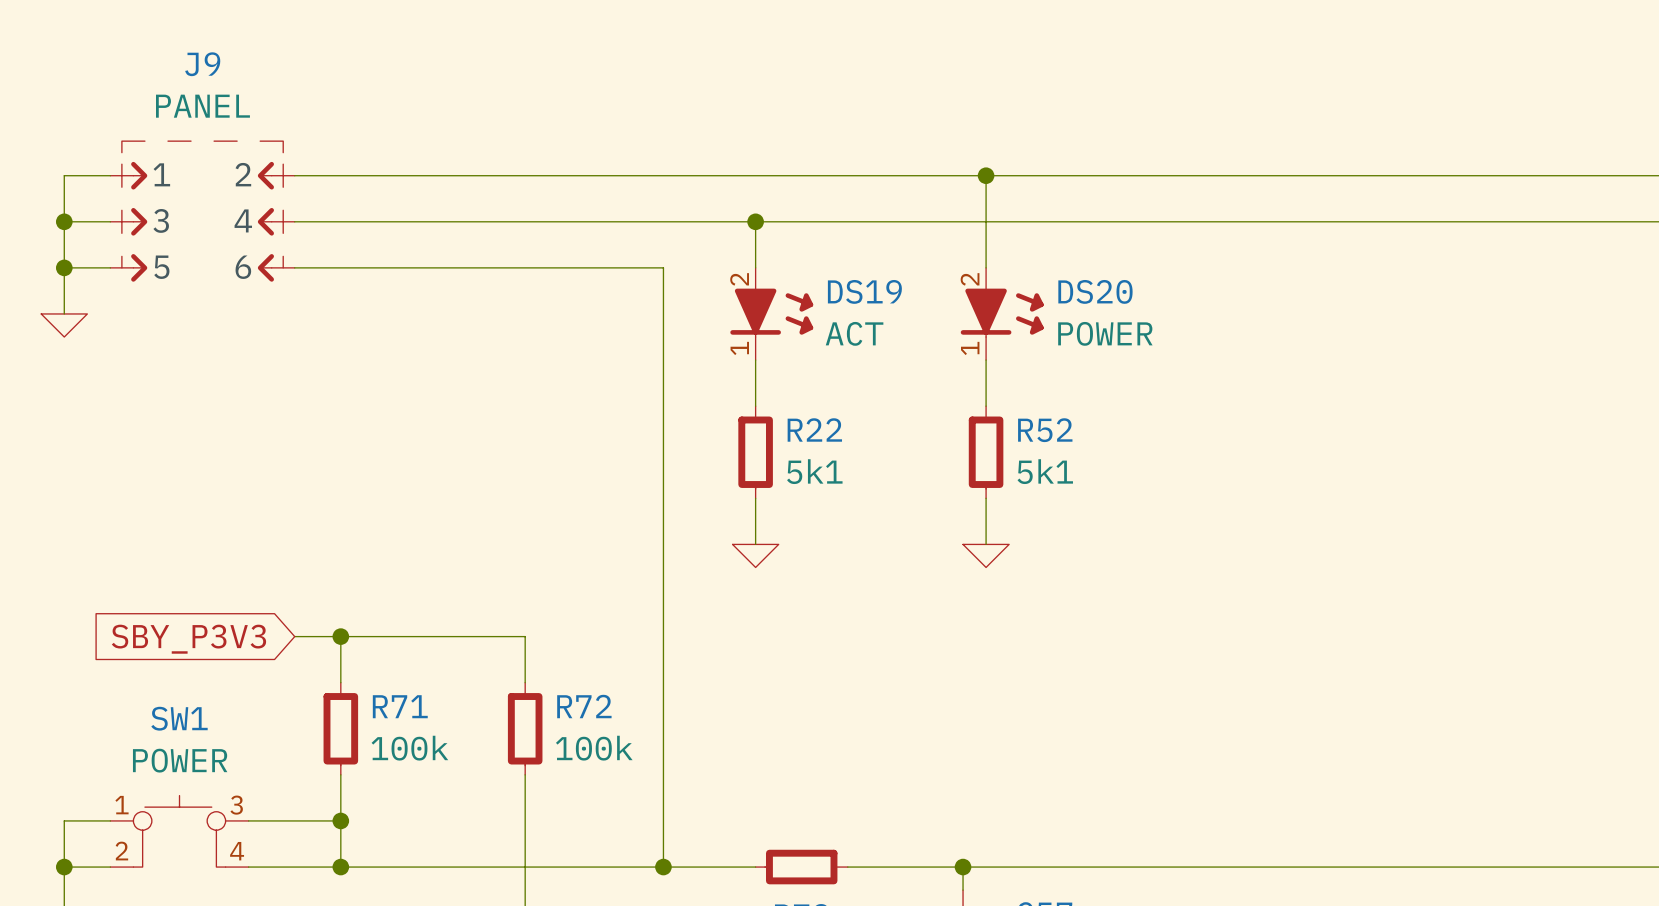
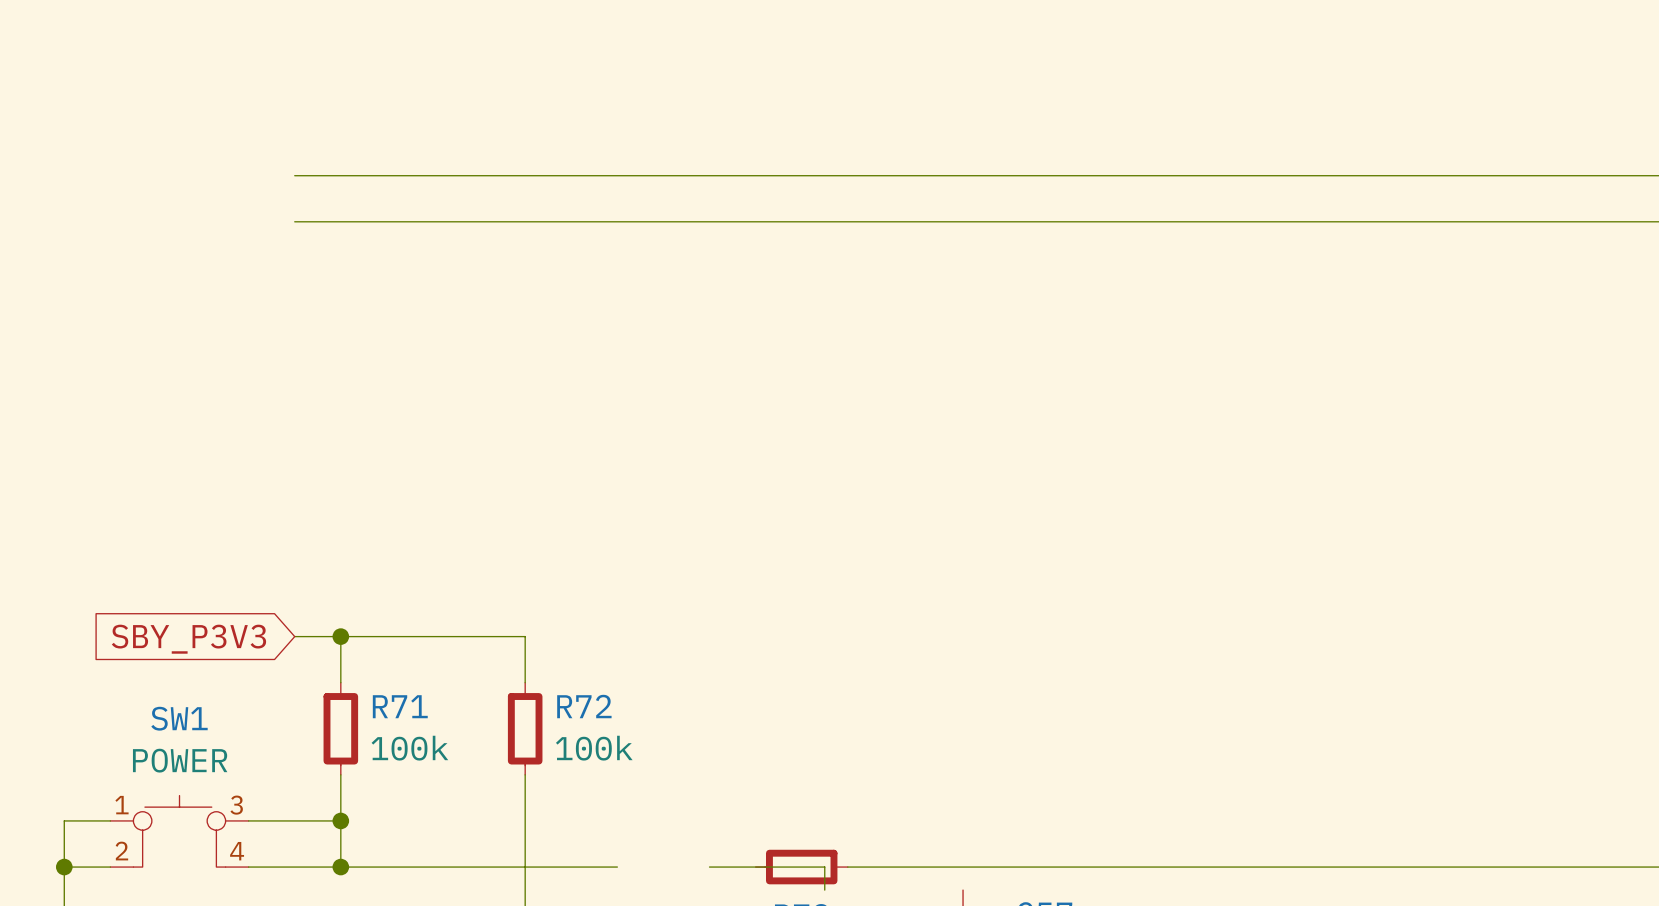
wire: (110, 175) (64, 175) (64, 313) -> none
wire: (986, 175) (986, 267) -> none
junction: (986, 175) -> none
J9: PANEL (202, 211) -> none
wire: (64, 221) (110, 221) -> none
junction: (64, 221) -> none
wire: (755, 221) (755, 267) -> none
junction: (755, 221) -> none
wire: (64, 267) (110, 267) -> none
junction: (64, 267) -> none
wire: (294, 267) (663, 267) (663, 867) -> none
DS19: ACT (771, 313) -> none
DS20: POWER (1002, 313) -> none
power symbol: (64, 325) -> none
wire: (755, 360) (755, 406) -> none
wire: (986, 360) (986, 406) -> none
R22: 5k1 (755, 452) -> none
R52: 5k1 (986, 452) -> none
wire: (755, 498) (755, 544) -> none
wire: (986, 498) (986, 544) -> none
power symbol: (755, 555) -> none
power symbol: (986, 555) -> none
wire: (617, 867) (709, 867) -> none
junction: (663, 867) -> none
wire: none -> (755, 867) (824, 867) (824, 890)
wire: (963, 867) (963, 890) -> none
junction: (963, 867) -> none

